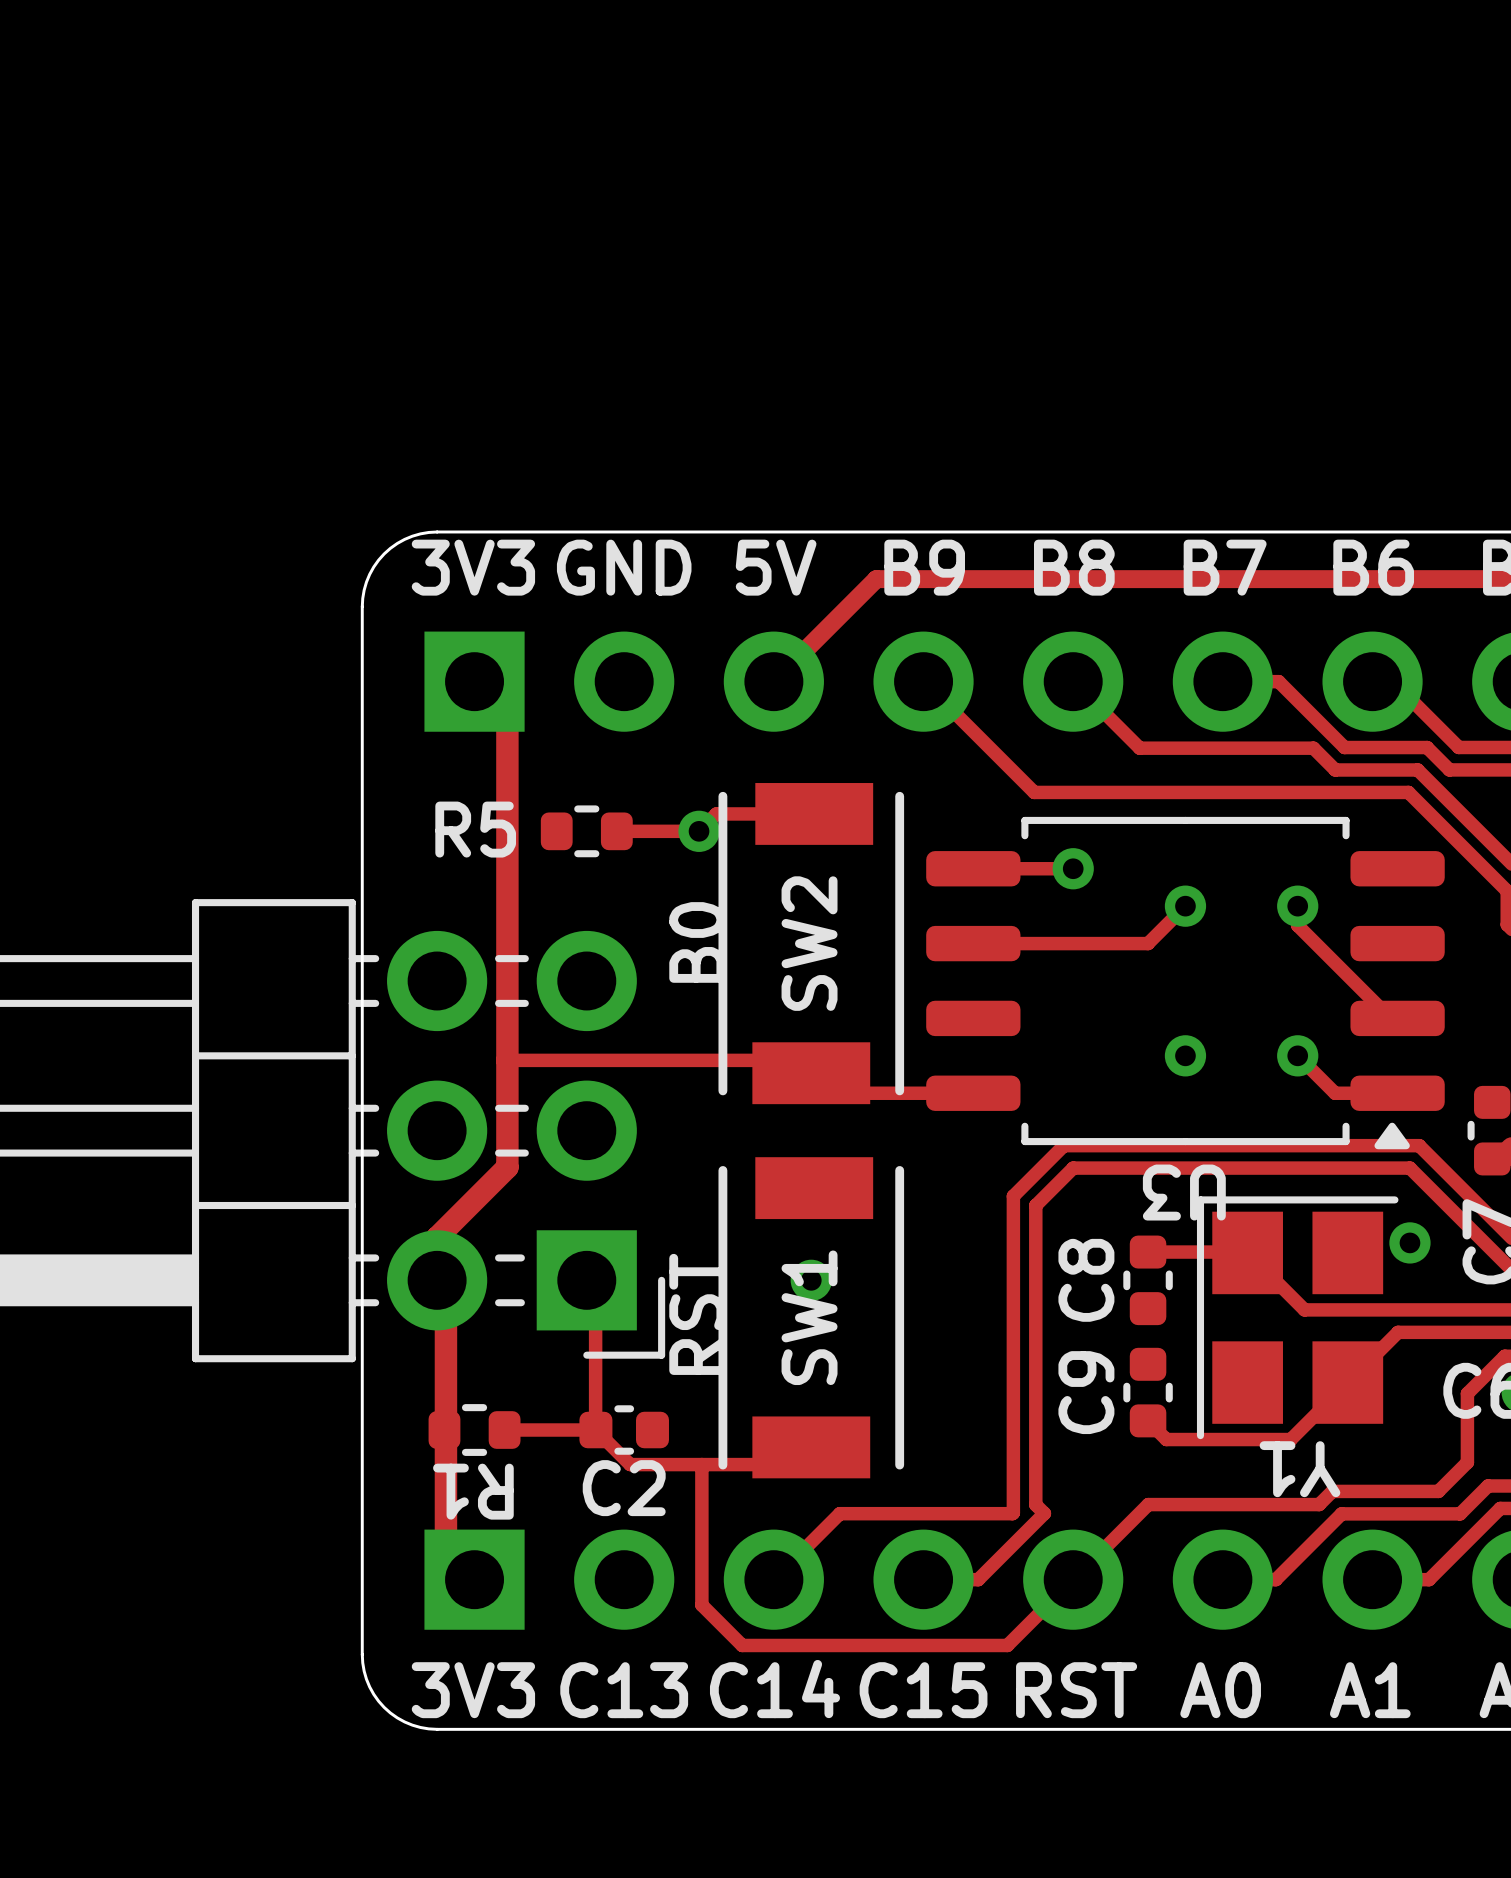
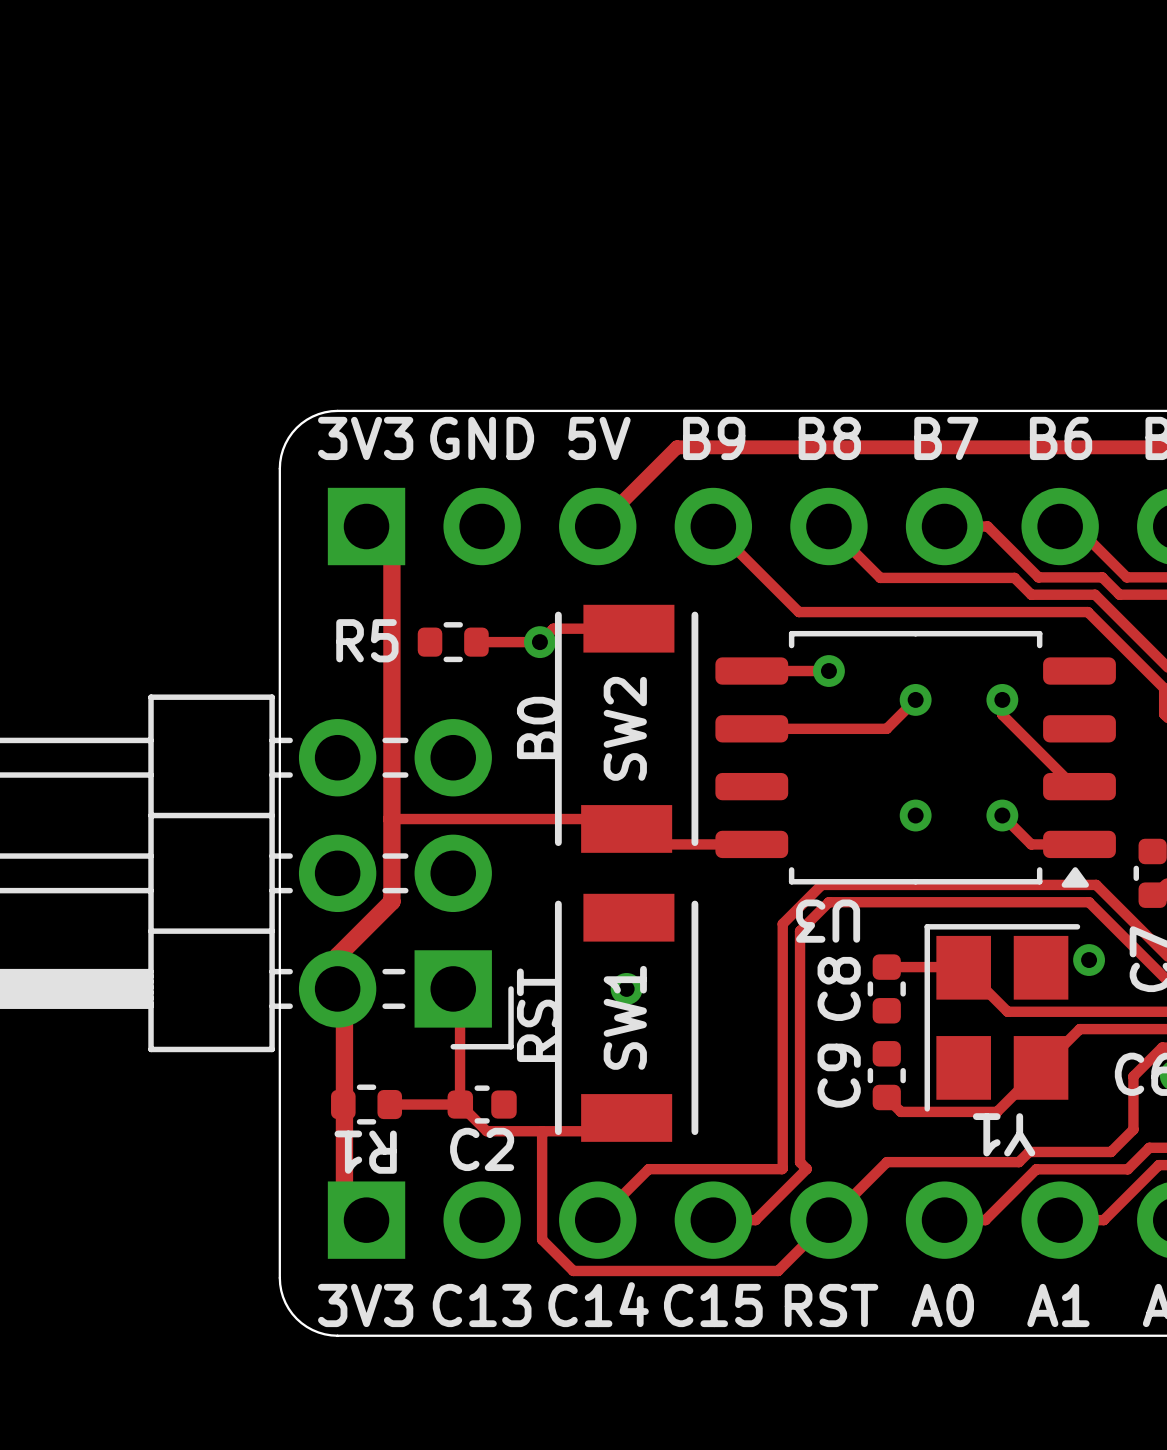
U3 name position: U3 (1184, 1192) -> U3 (828, 921)

